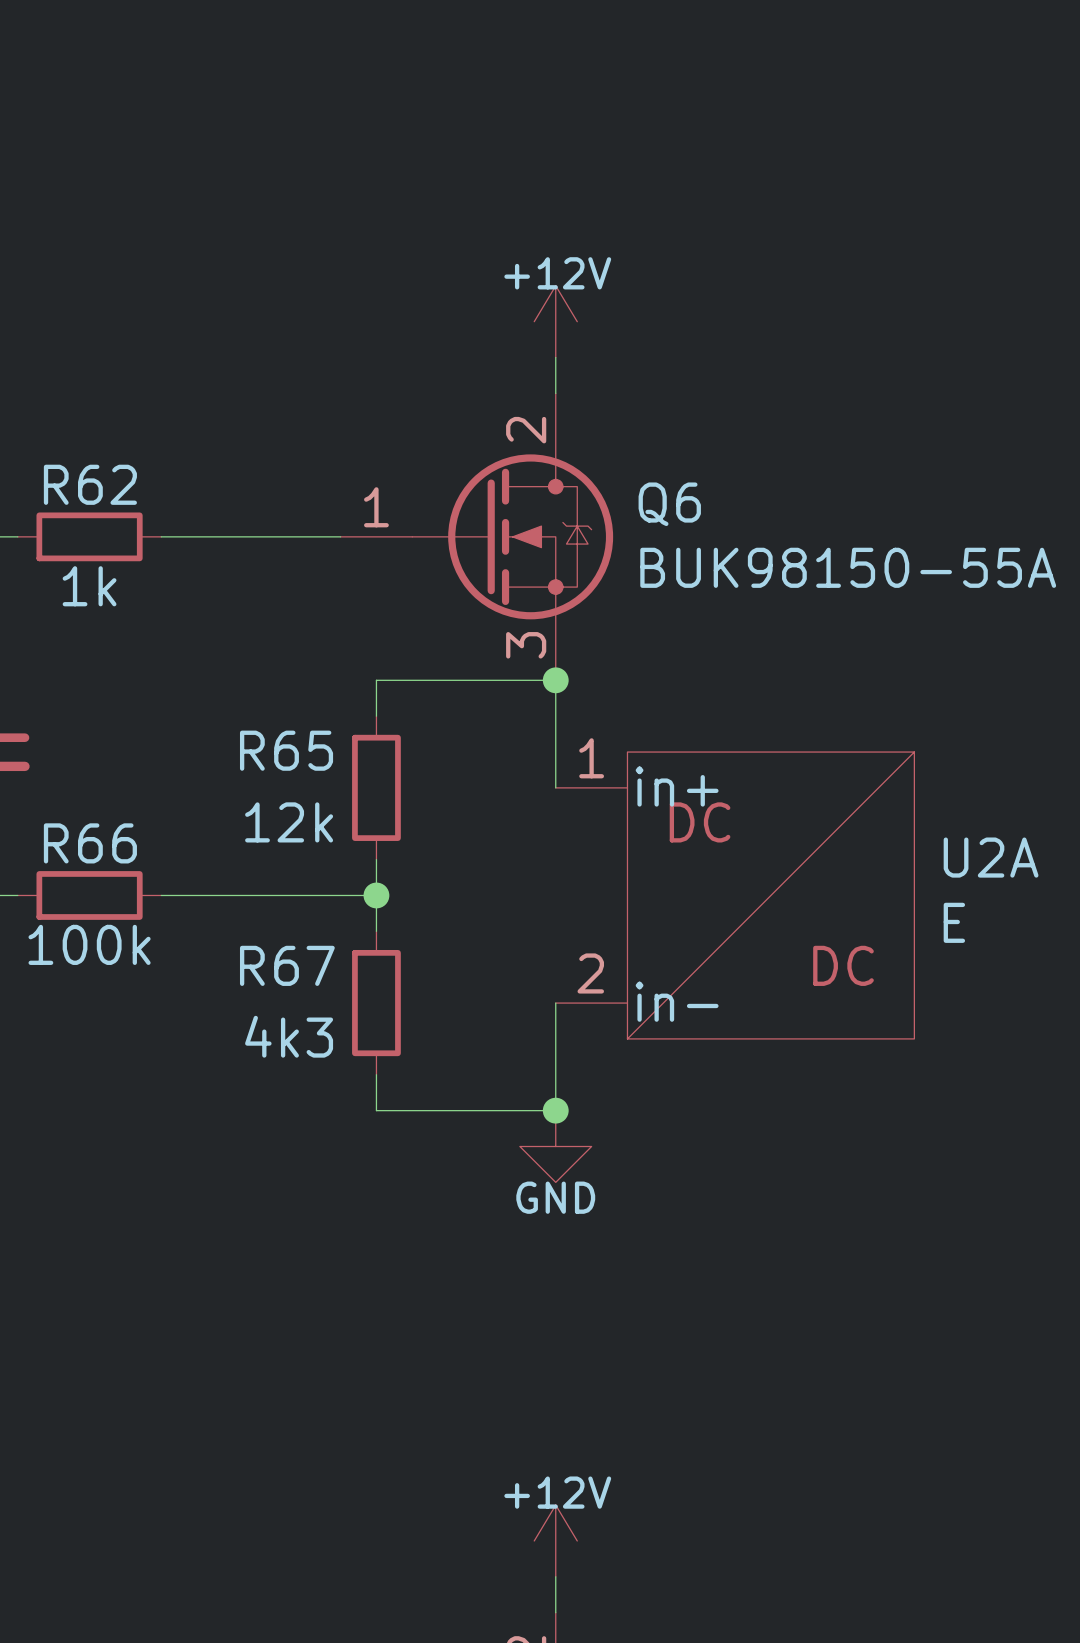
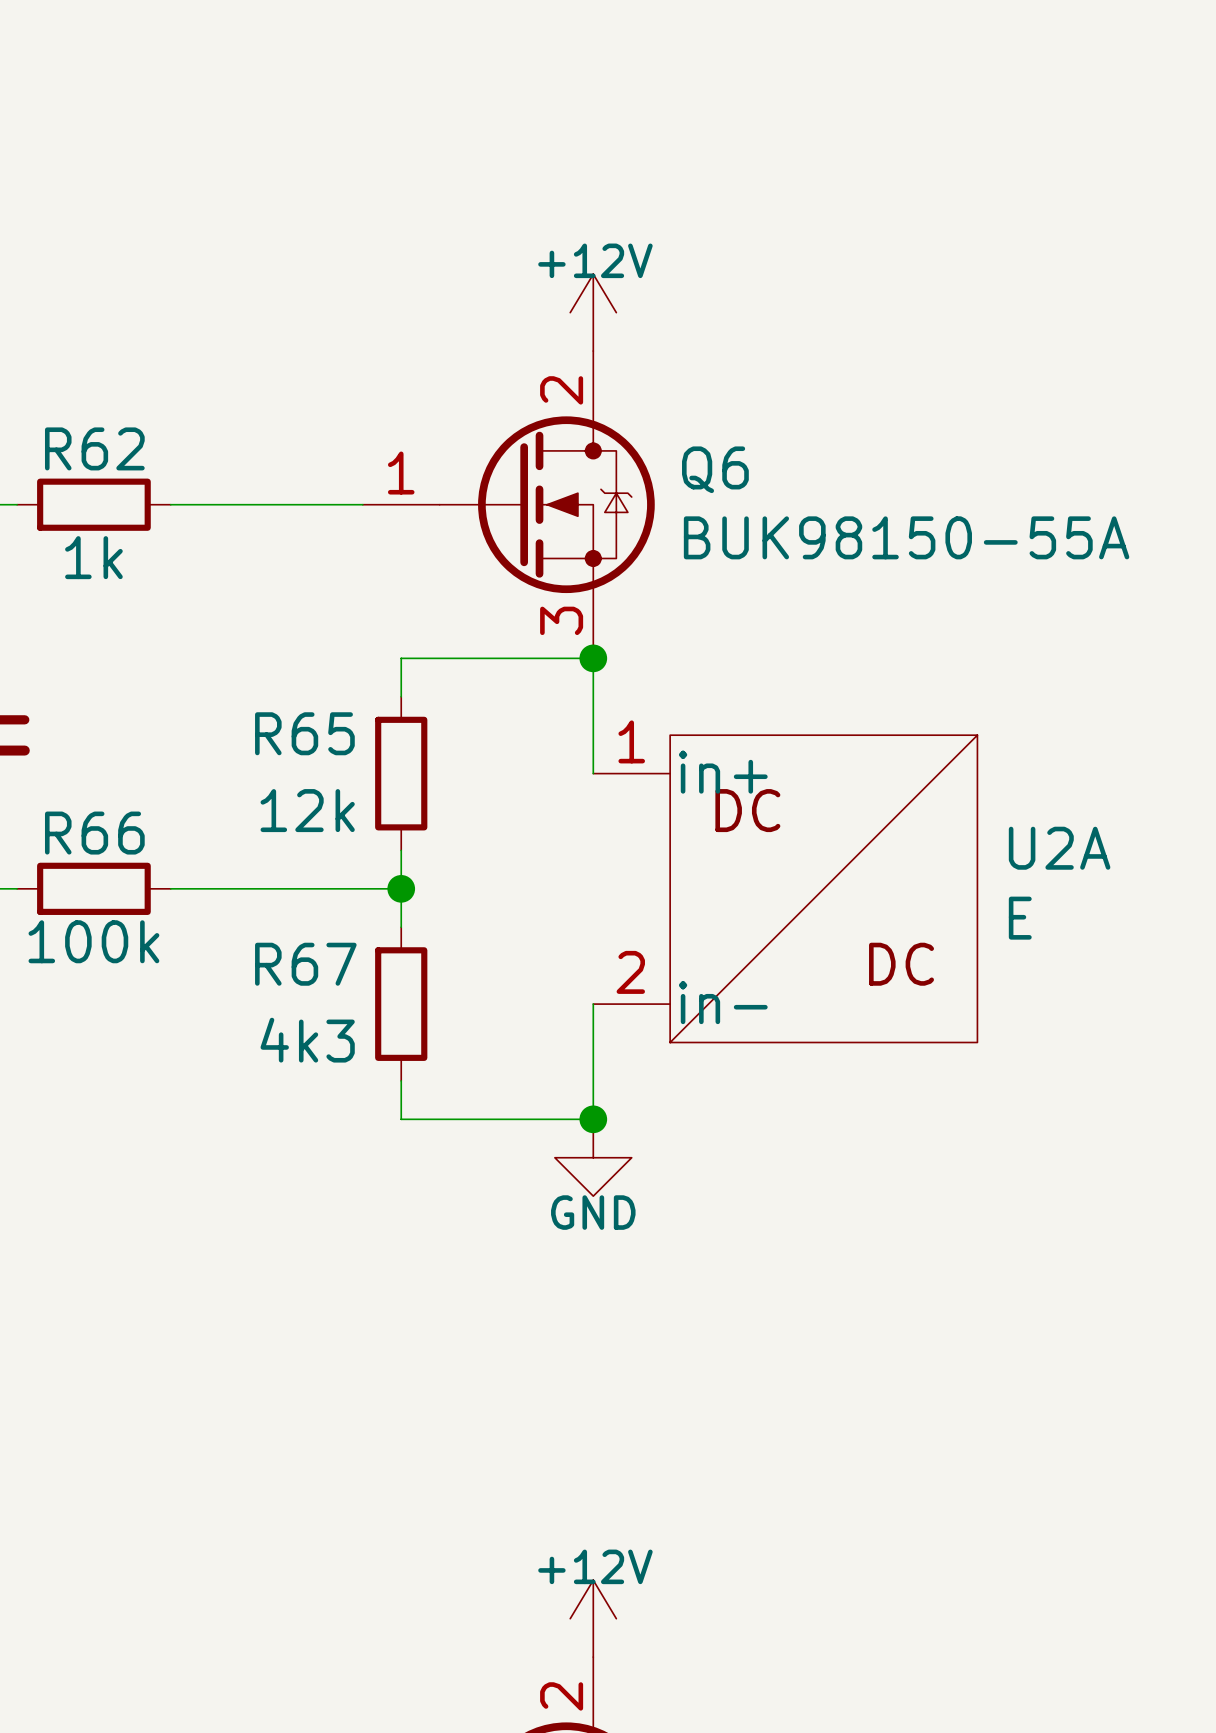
power symbol position: +12V (555, 321) -> +12V (593, 312)
power symbol position: +12V (555, 1540) -> +12V (593, 1618)

